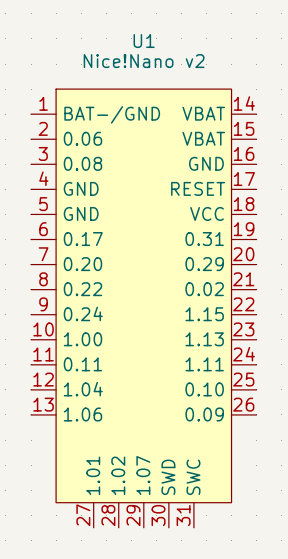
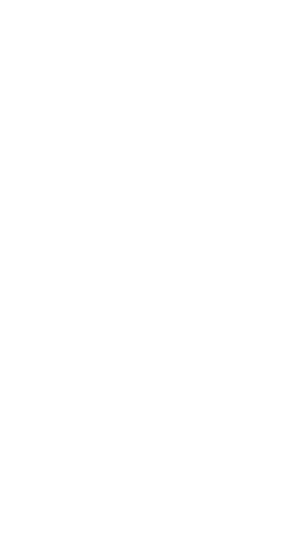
U1: Nice!Nano v2 (143, 308) -> none

